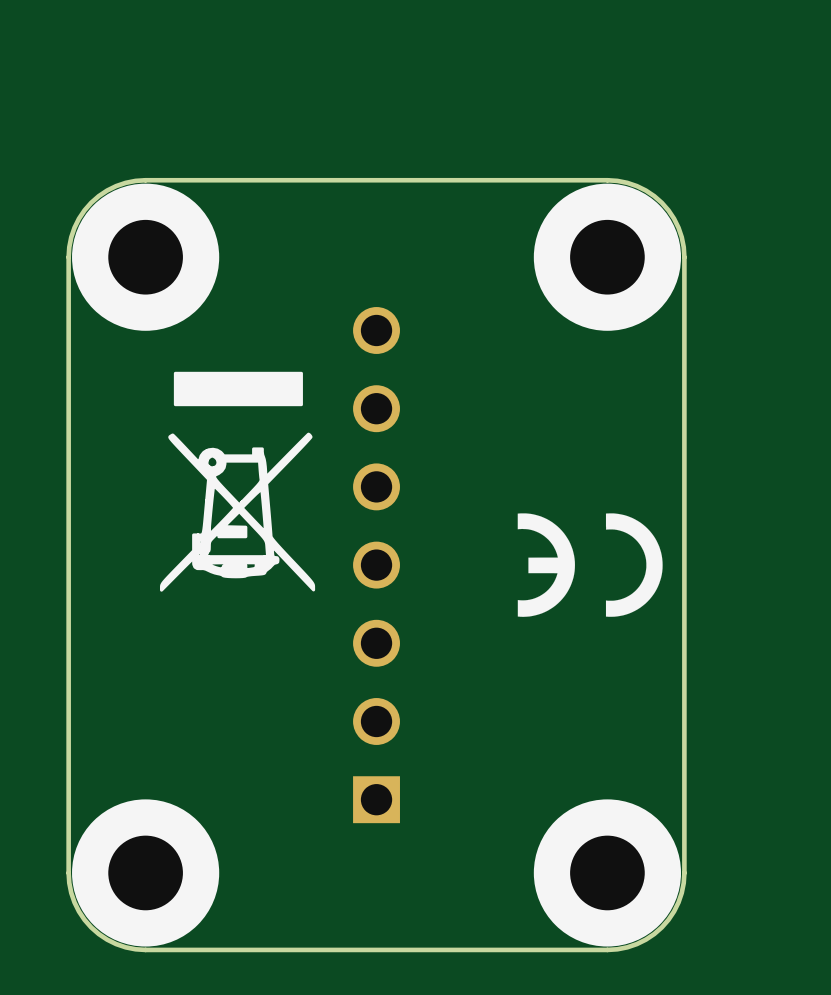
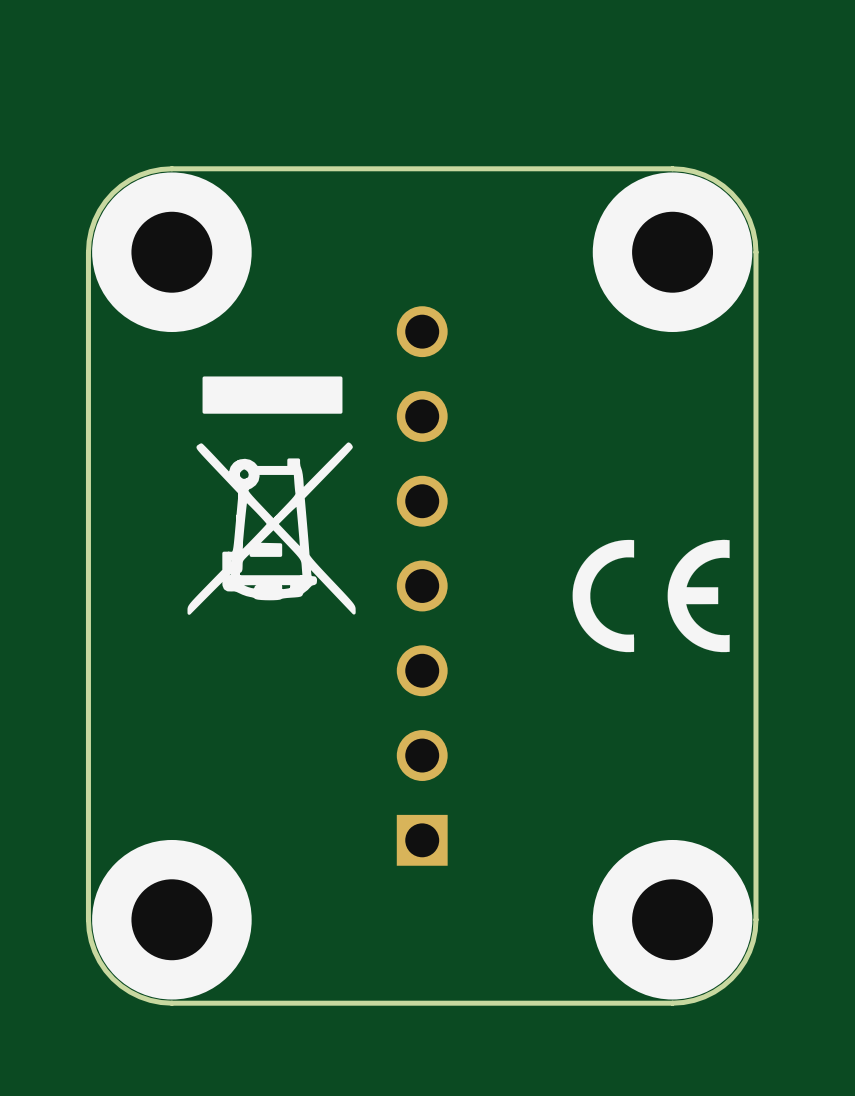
drawing shape: [517, 513, 663, 617] -> [572, 539, 730, 653]

